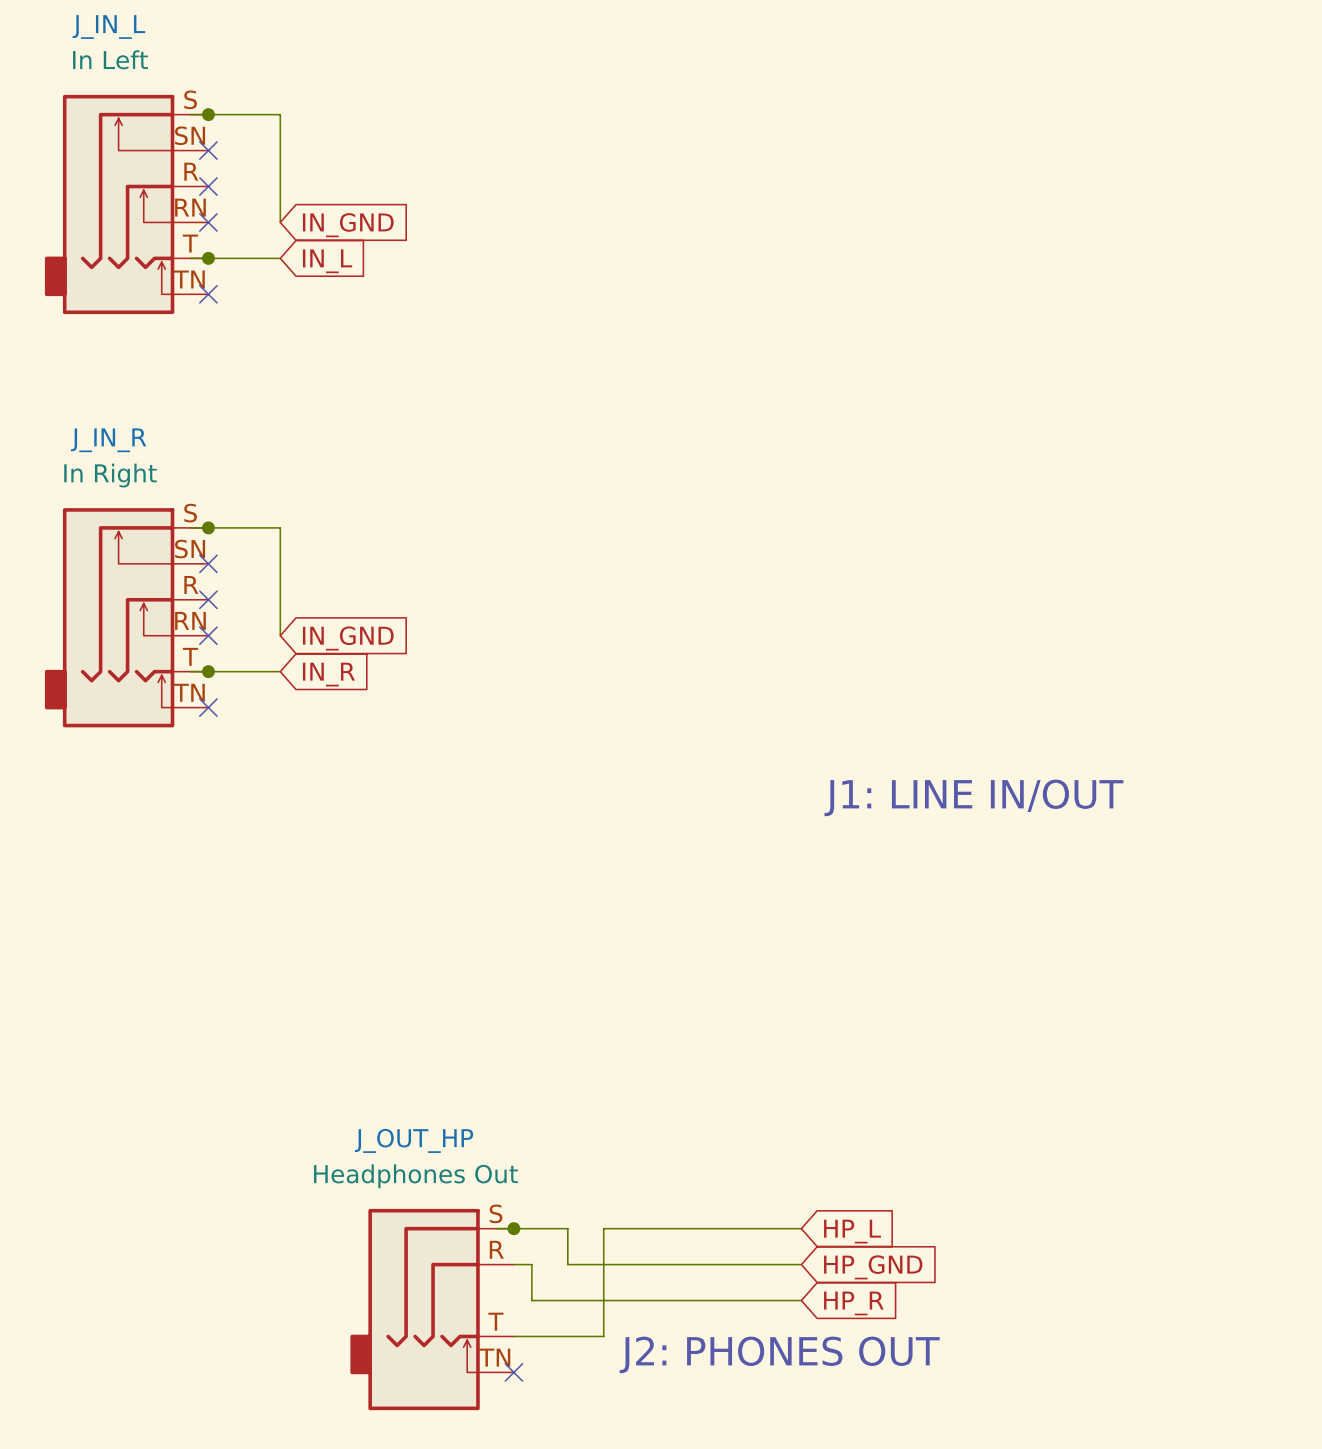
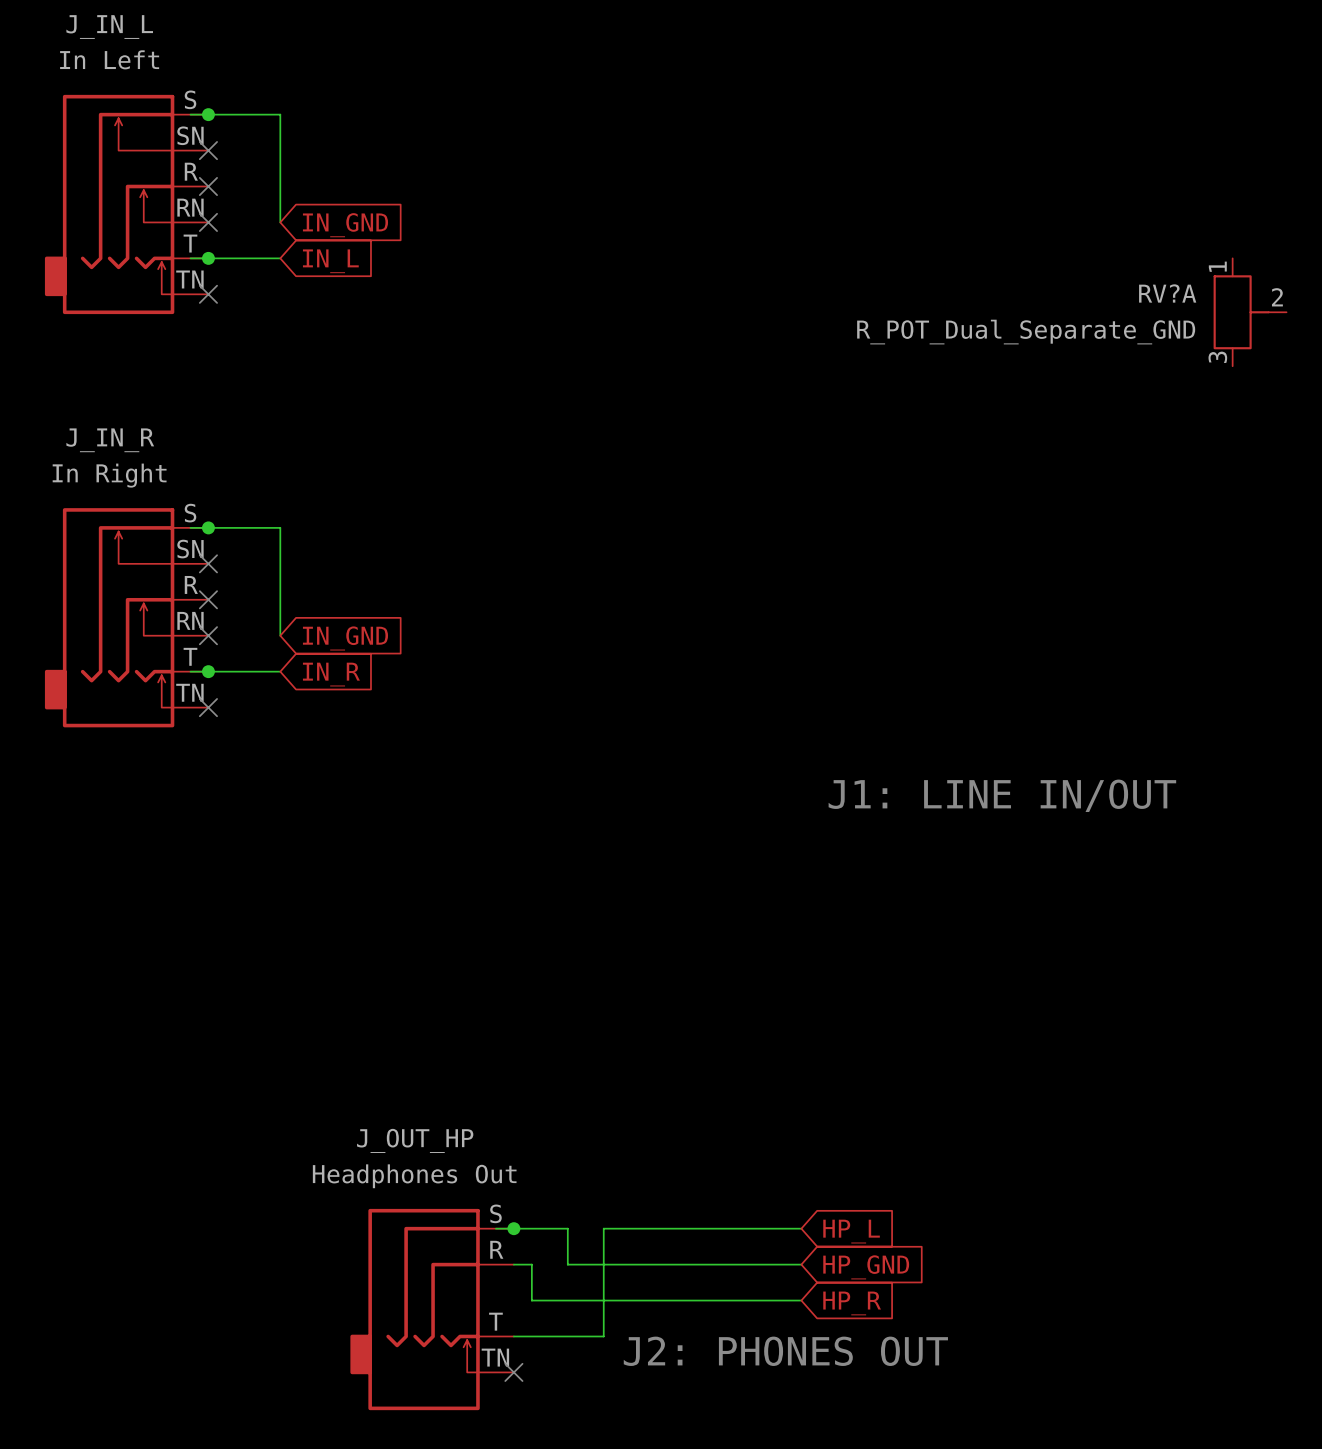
RV?A: none -> R_POT_Dual_Separate_GND (1250, 312)

